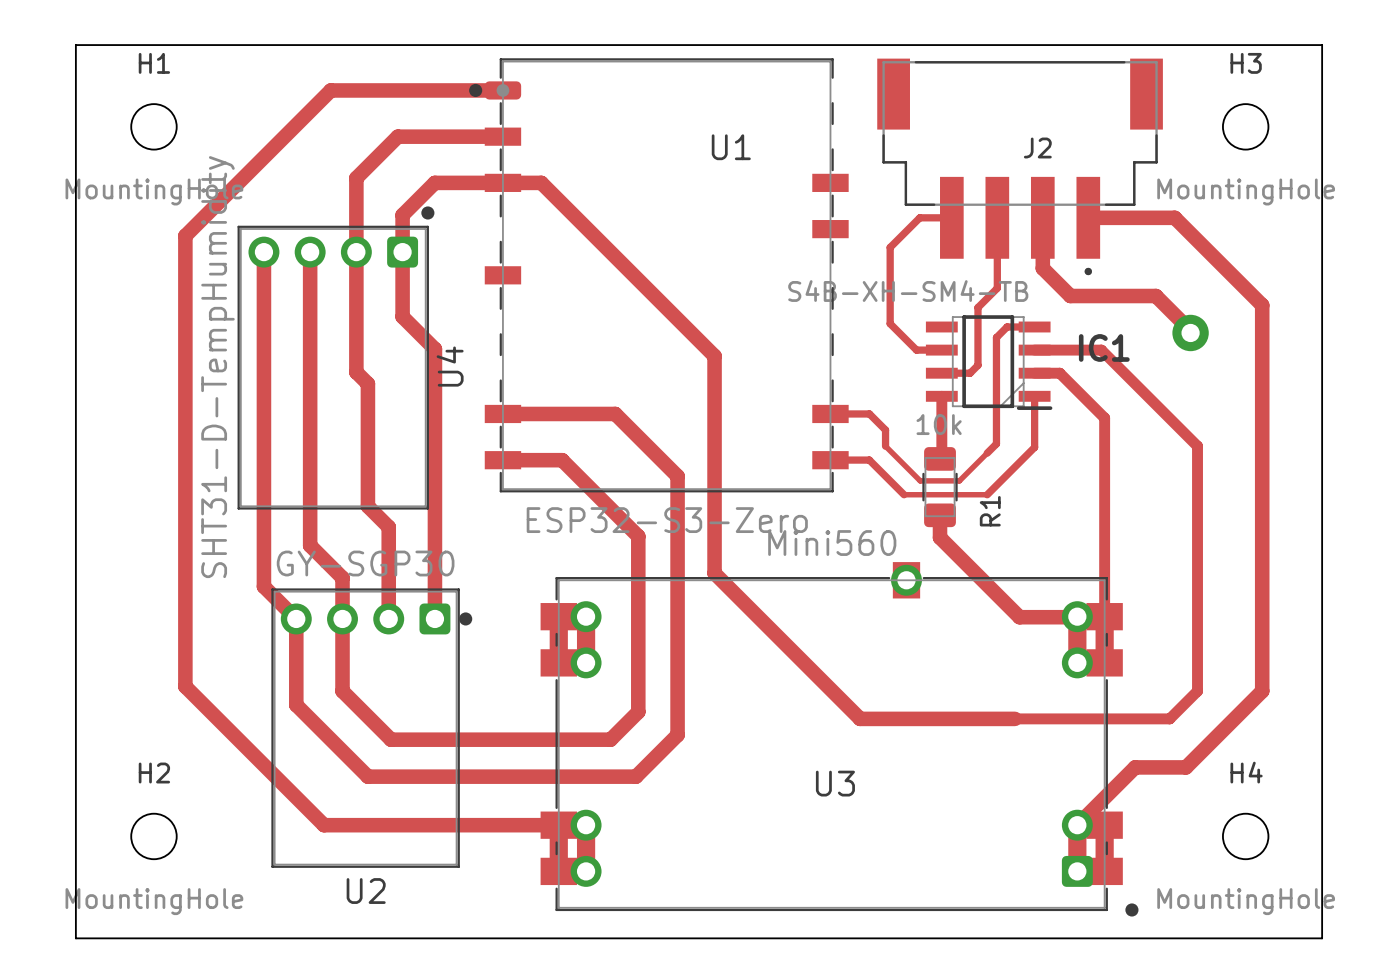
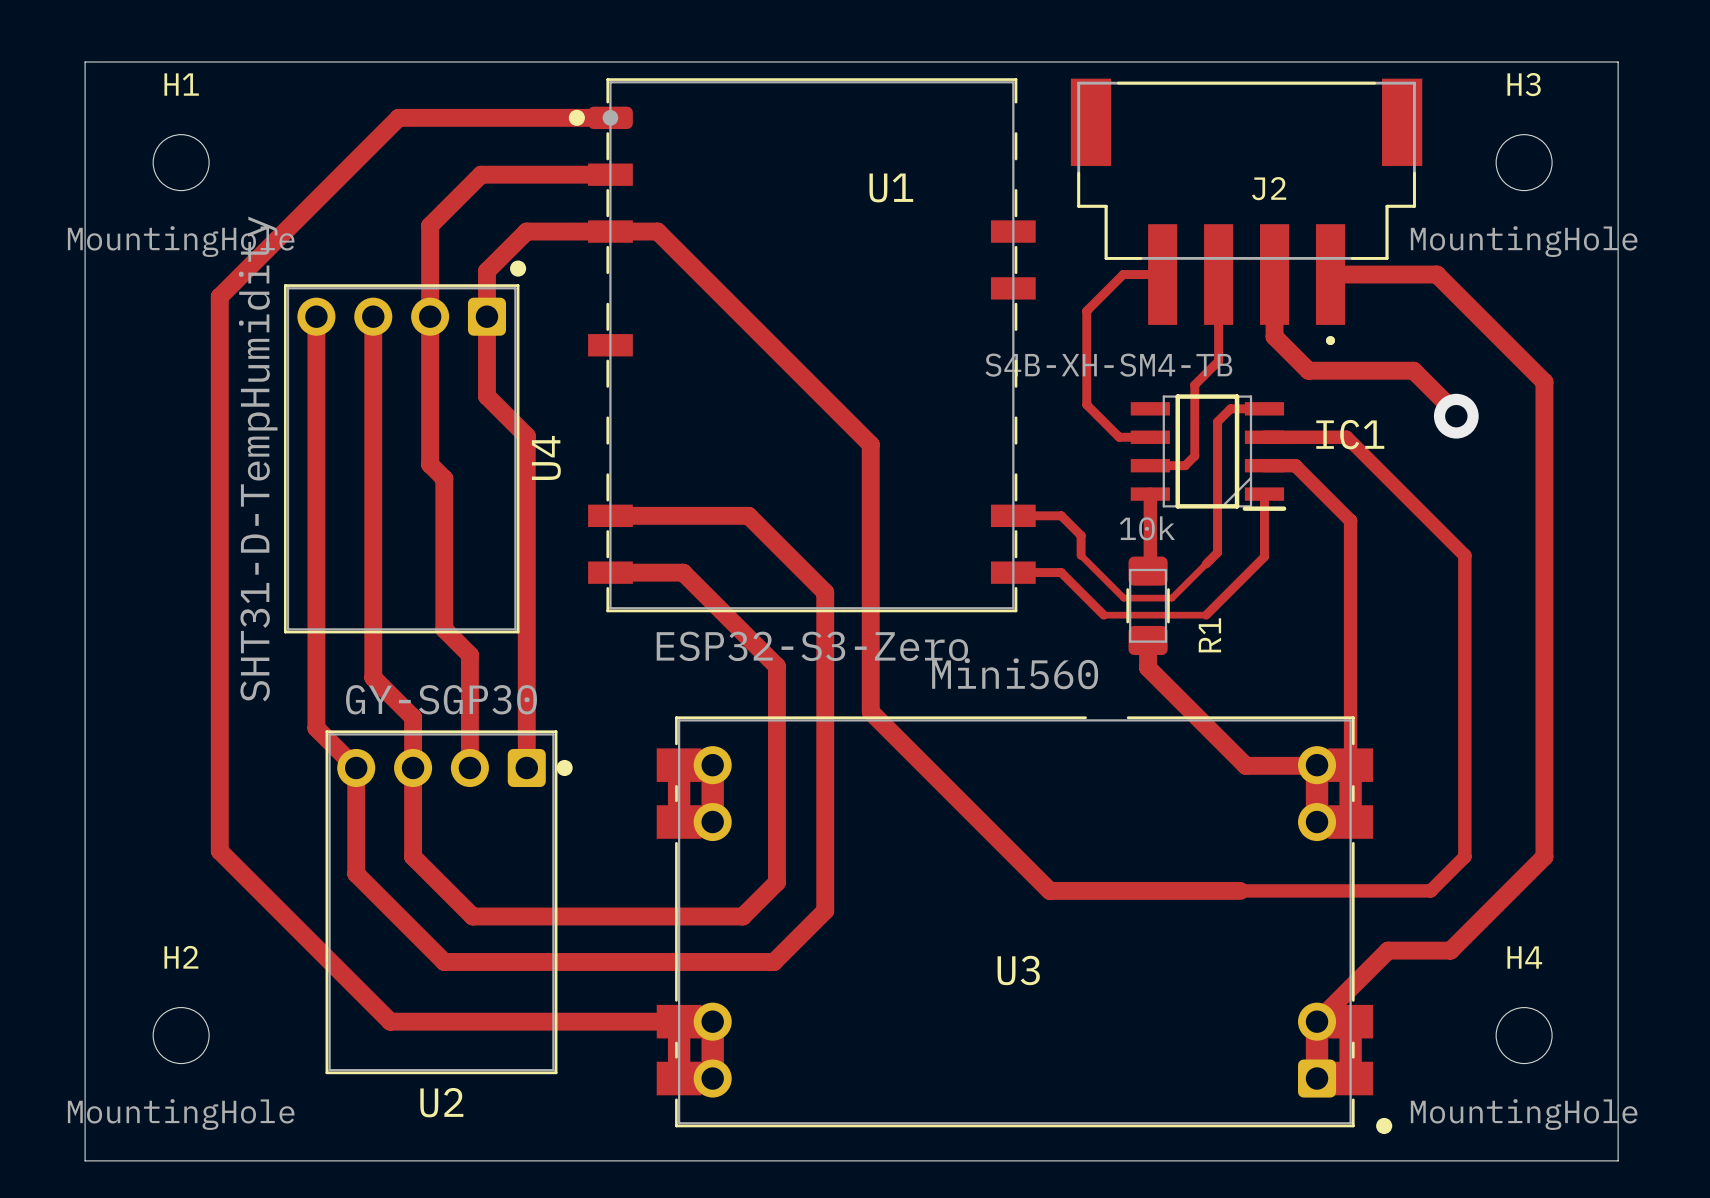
U3 footprint: [540, 562, 1139, 917] -> [656, 716, 1393, 1135]

